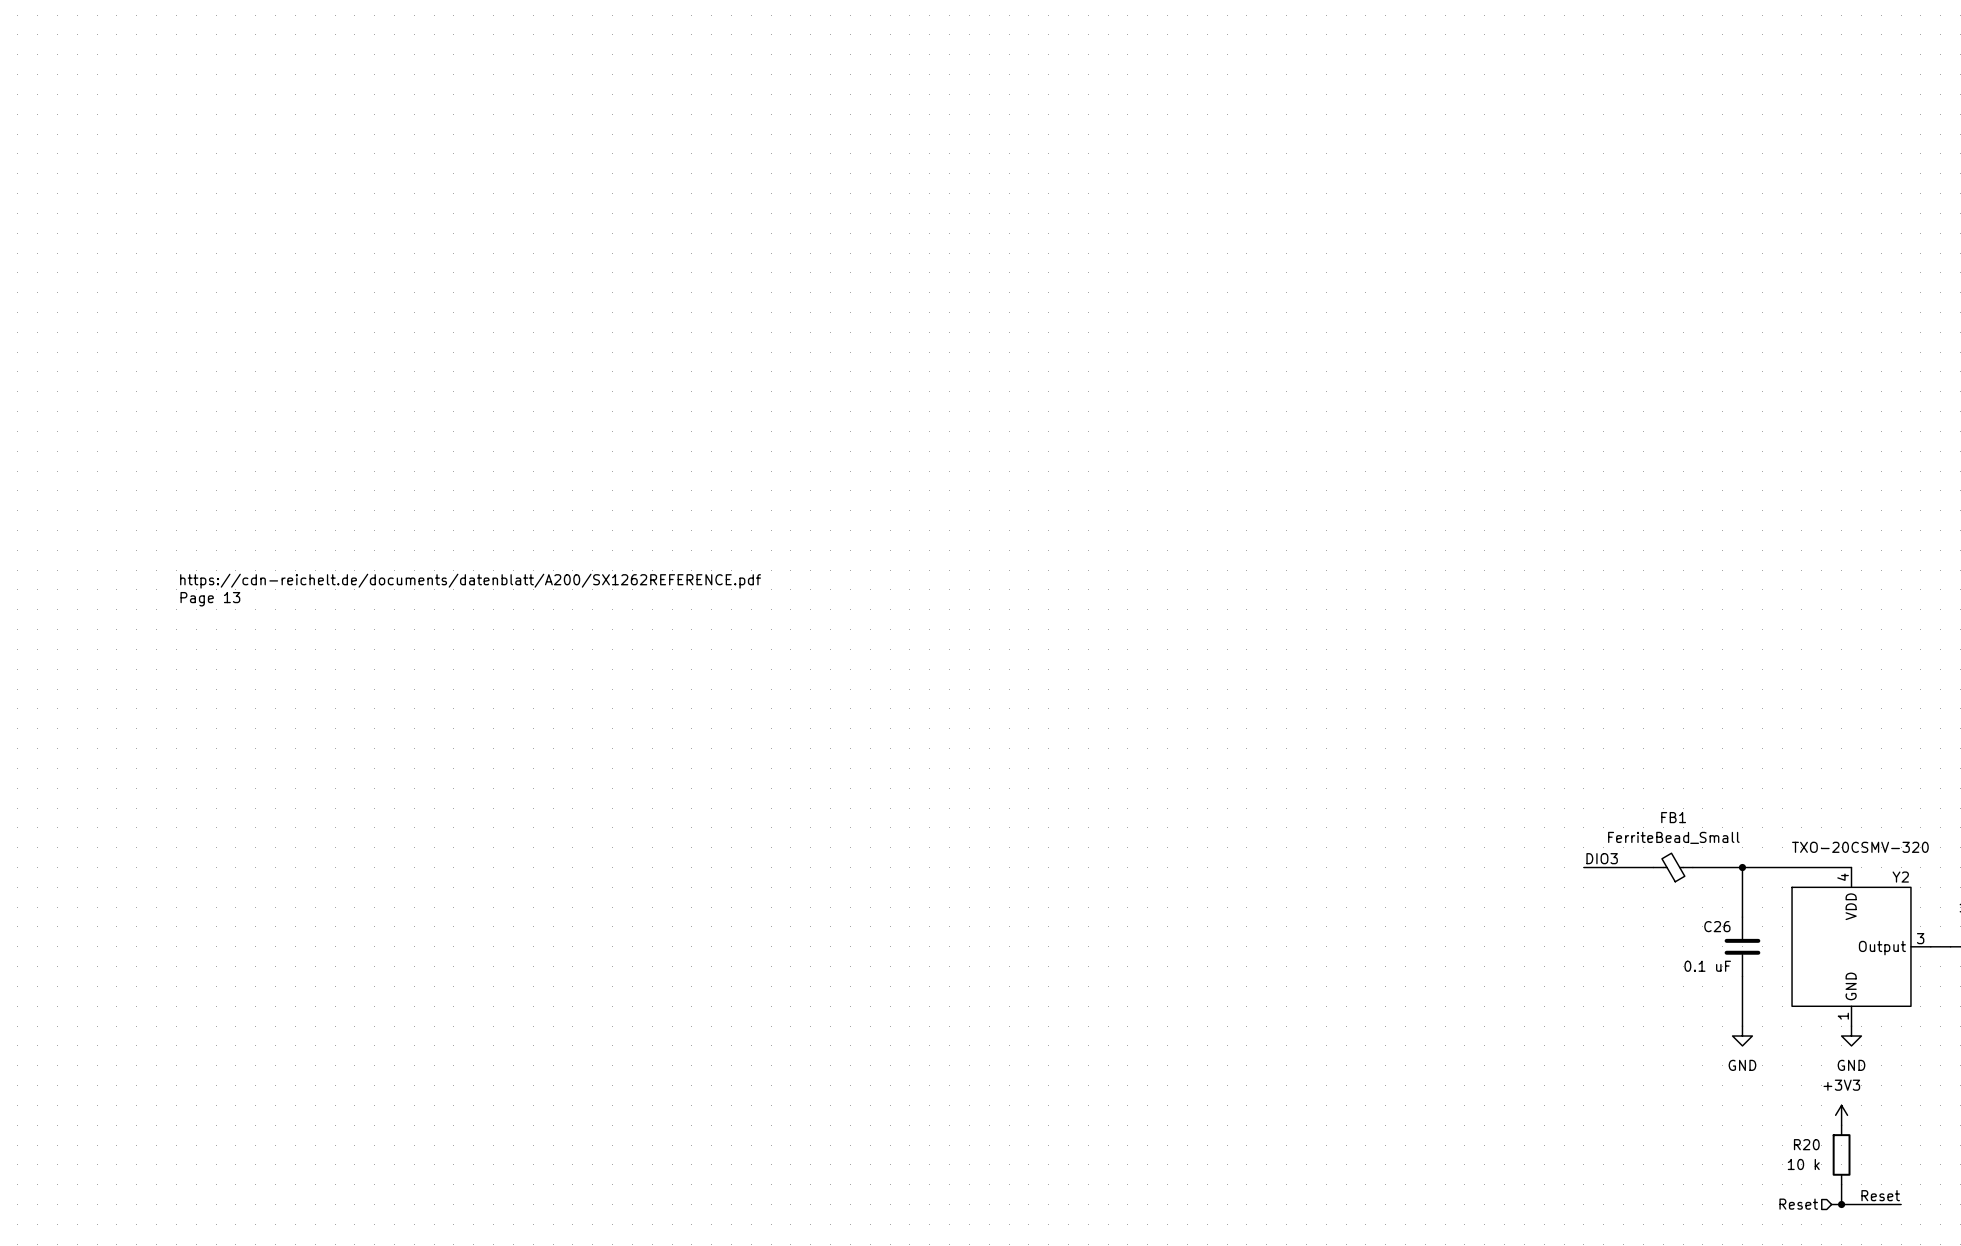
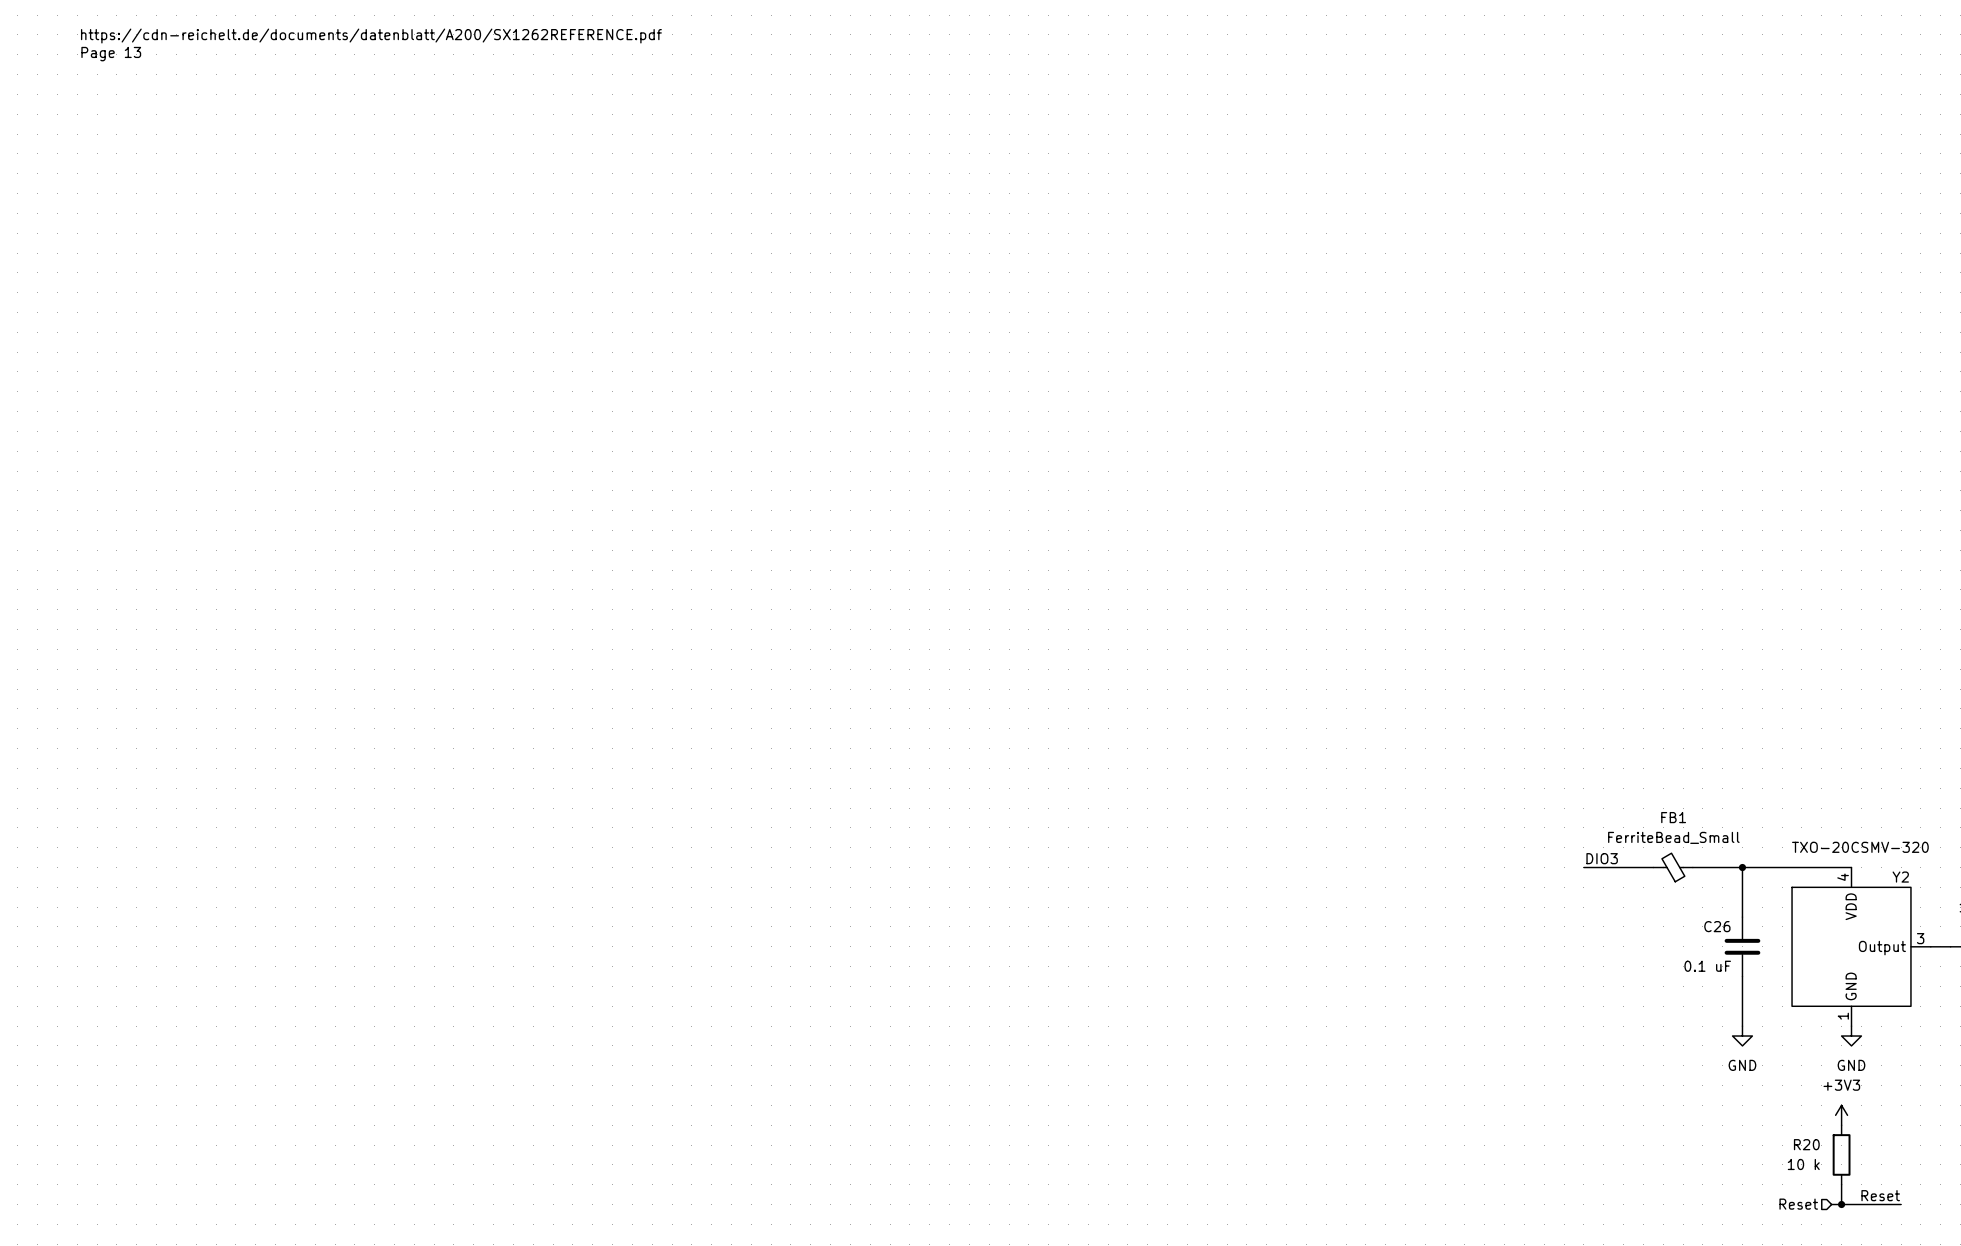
text: none -> https://cdn-reichelt.de/documents/datenblatt/A200/SX1262REFERENCE.pdf (371, 36)
text: none -> Page 13 (111, 54)
text: https://cdn-reichelt.de/documents/datenblatt/A200/SX1262REFERENCE.pdf (470, 581) -> none
text: Page 13 (210, 599) -> none

